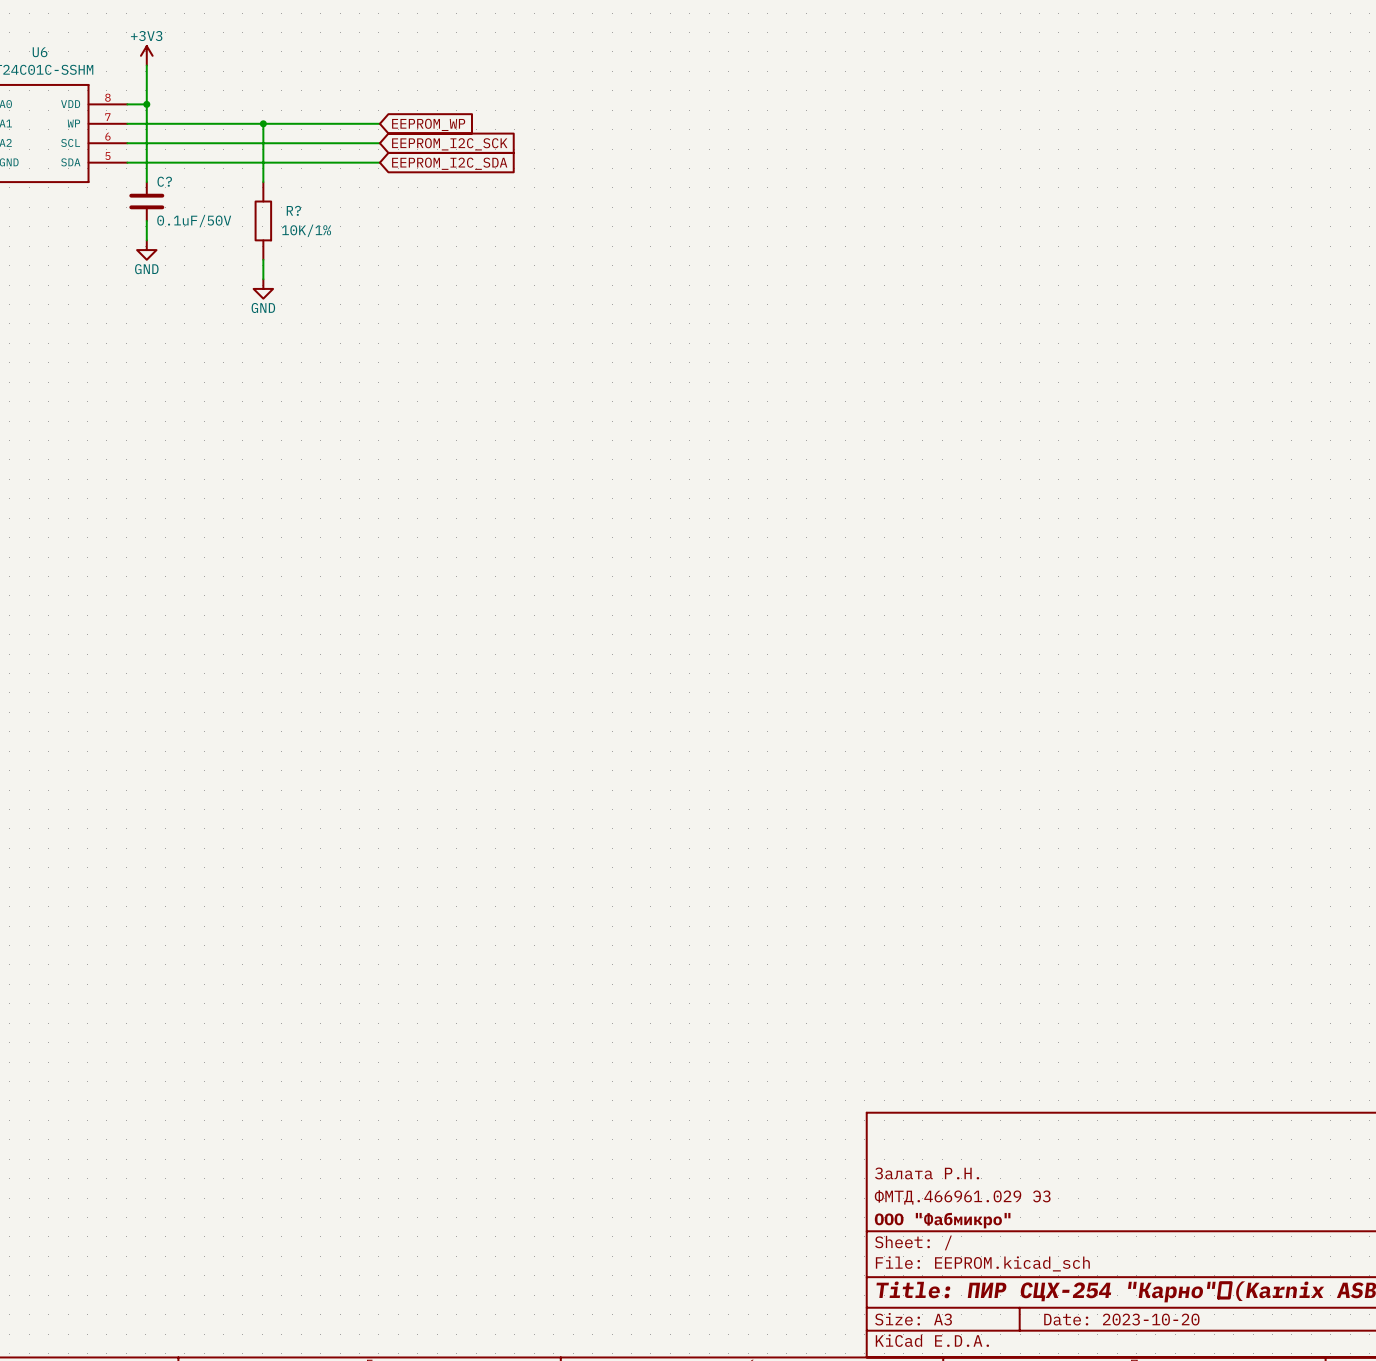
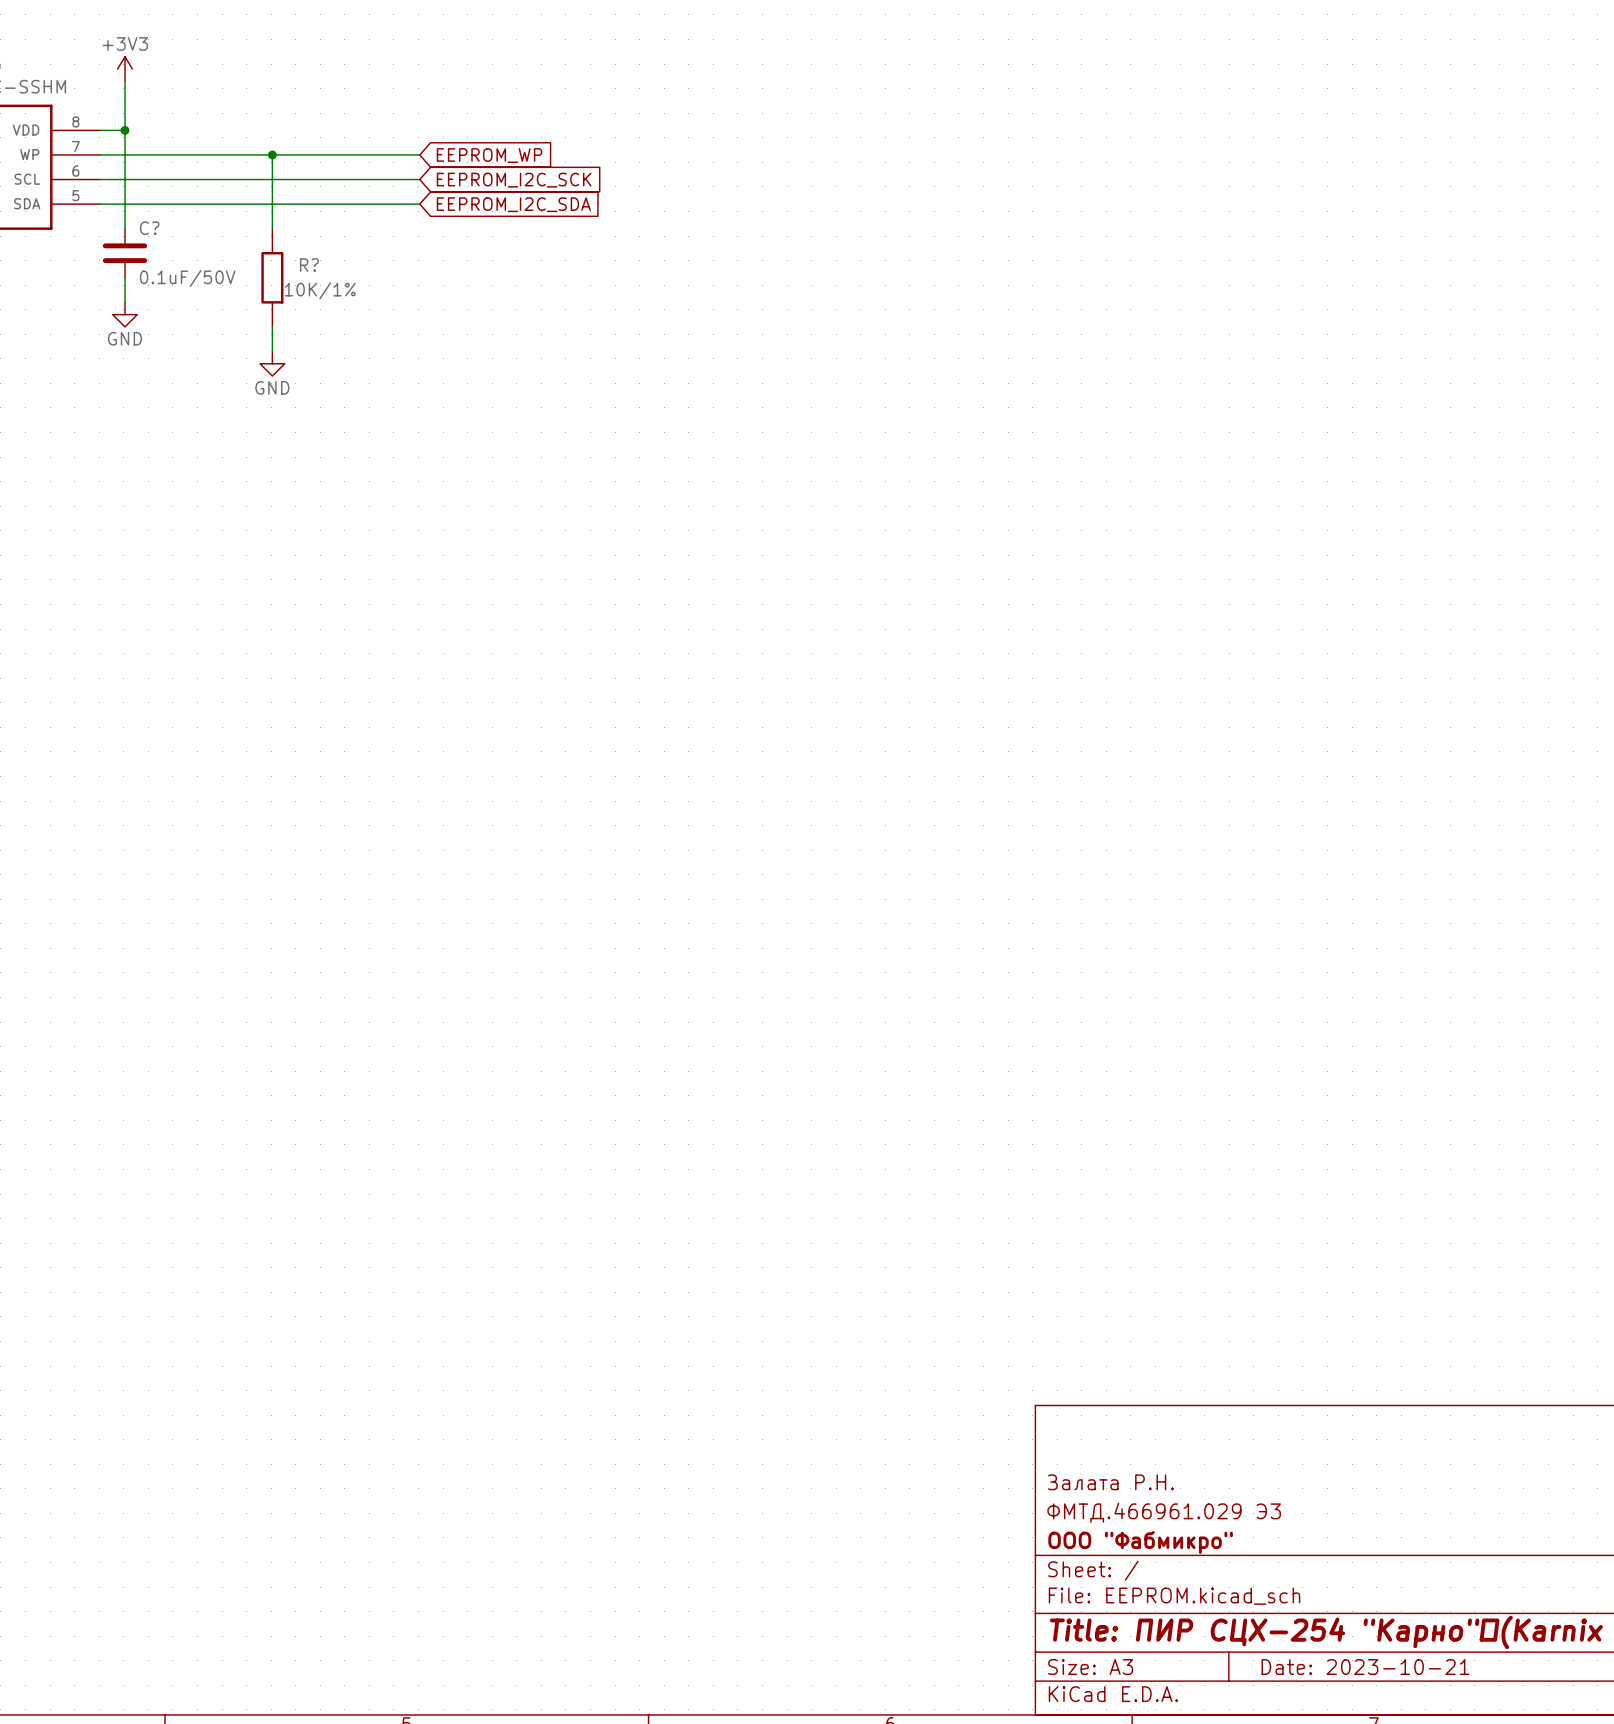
title block: Date: 2023-10-20 (1121, 1319) -> Date: 2023-10-21 (1365, 1667)

